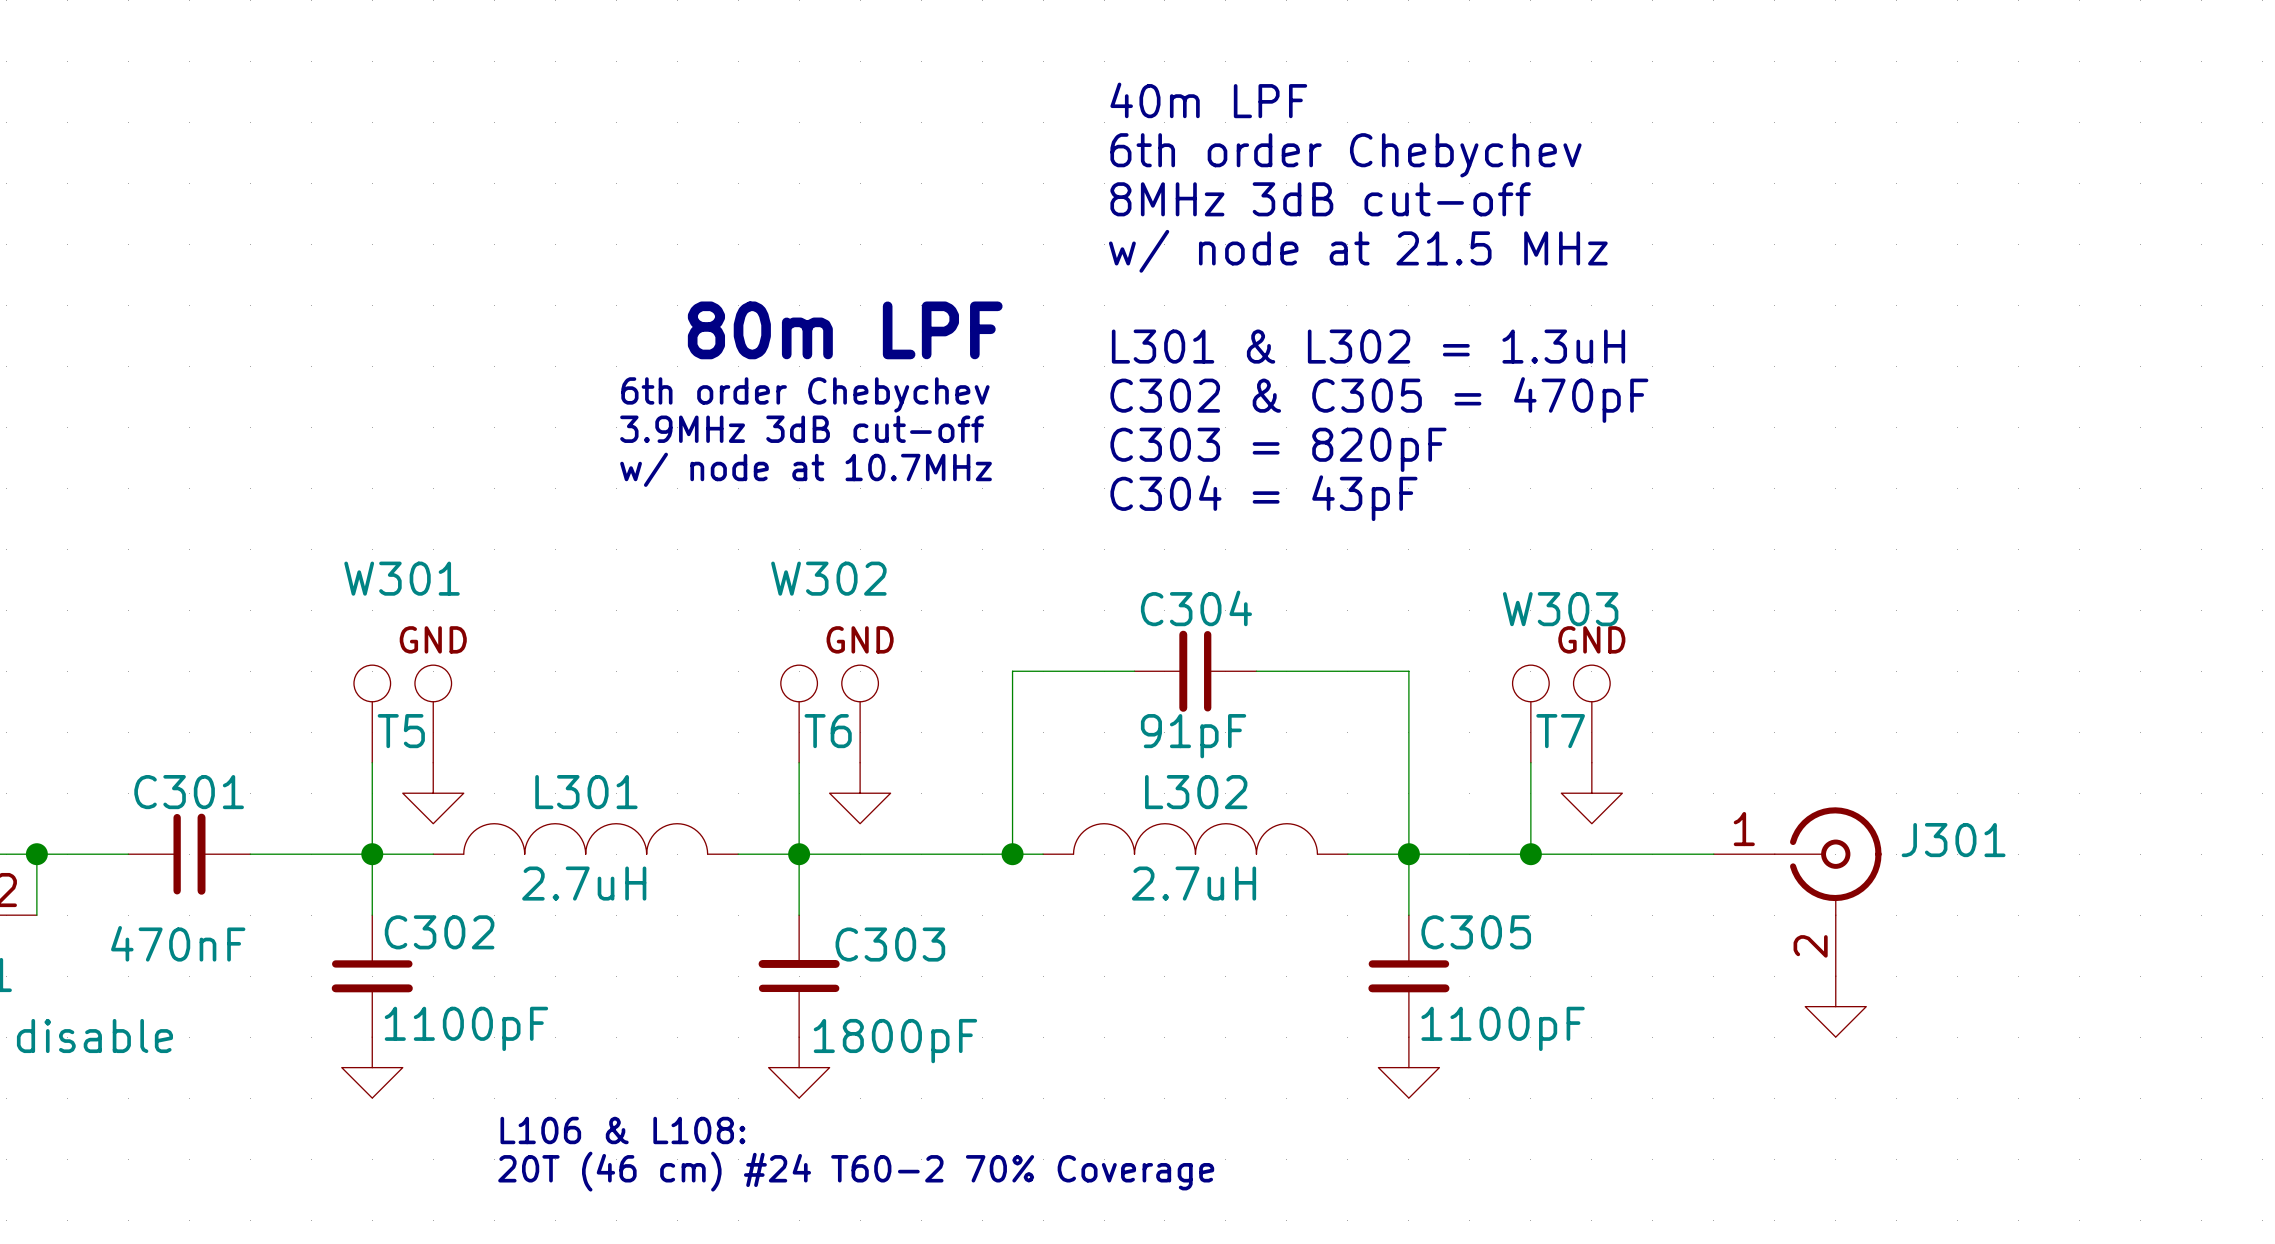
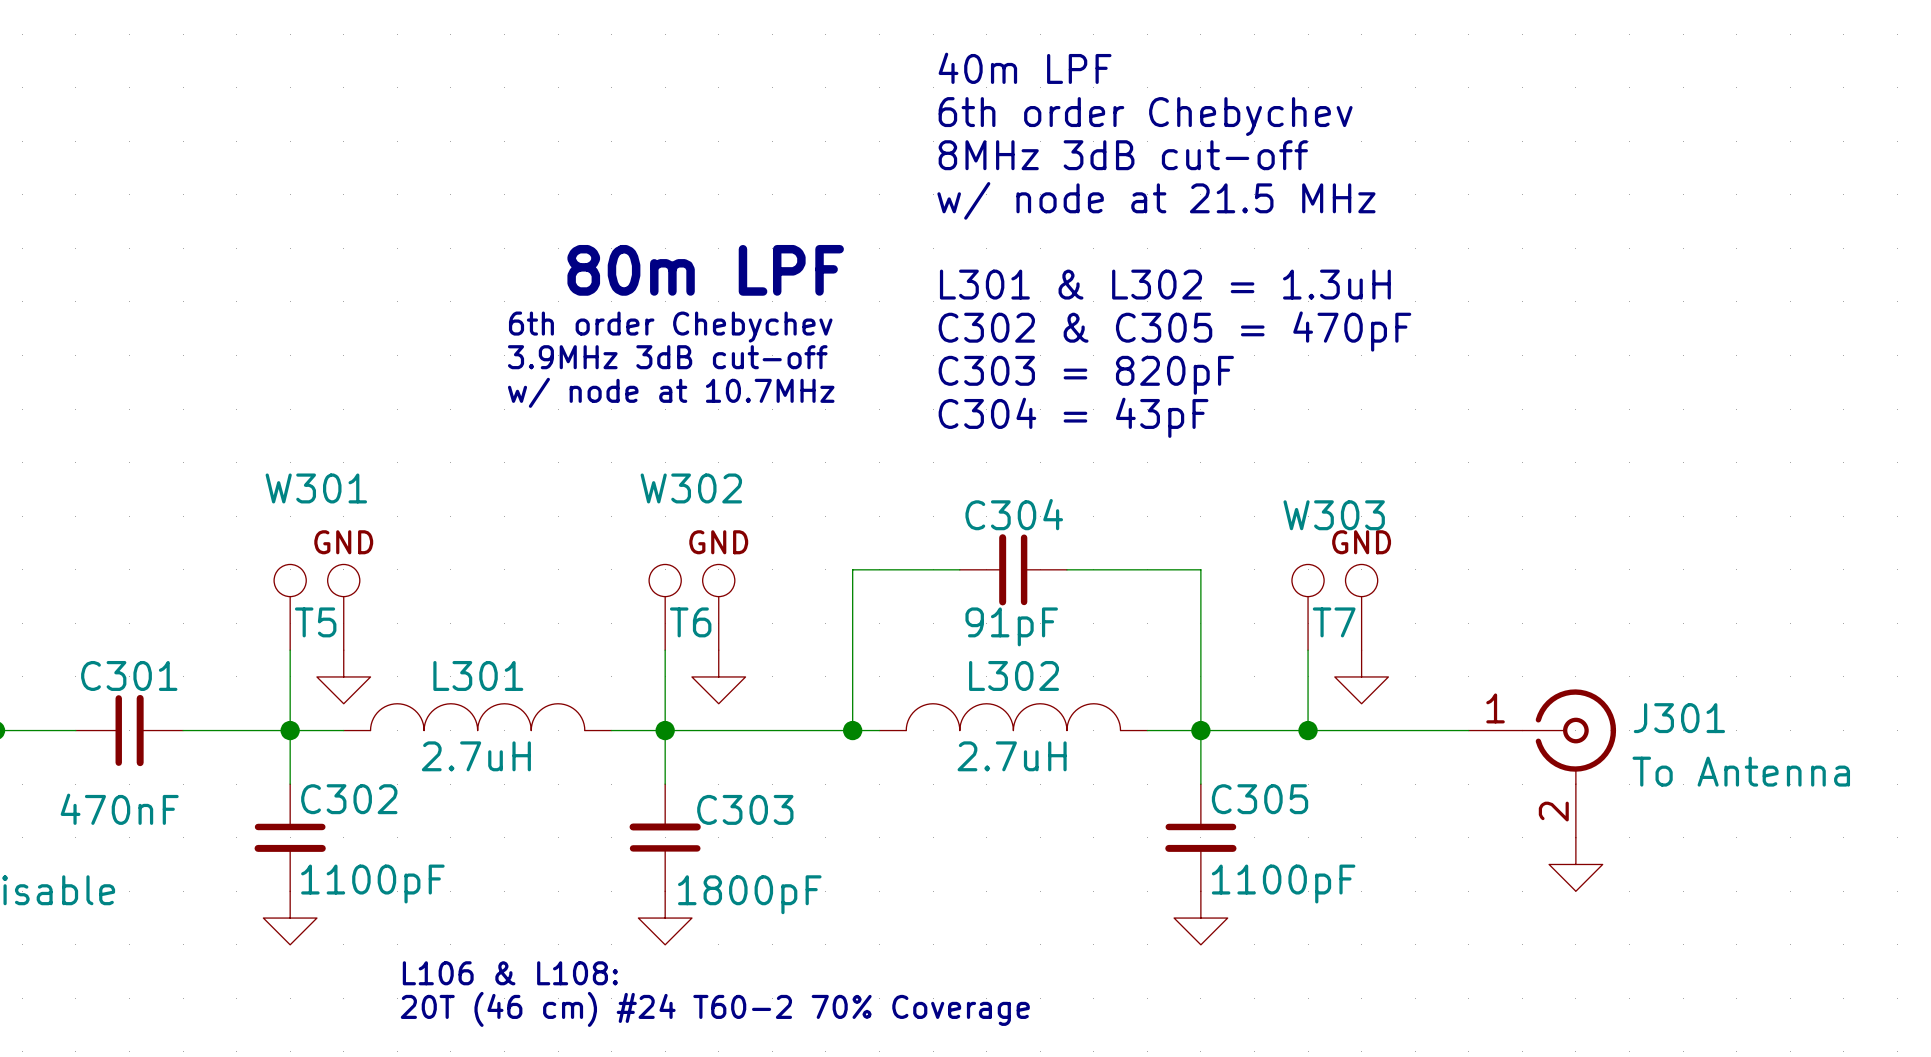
J301 value: none -> To Antenna (1741, 771)

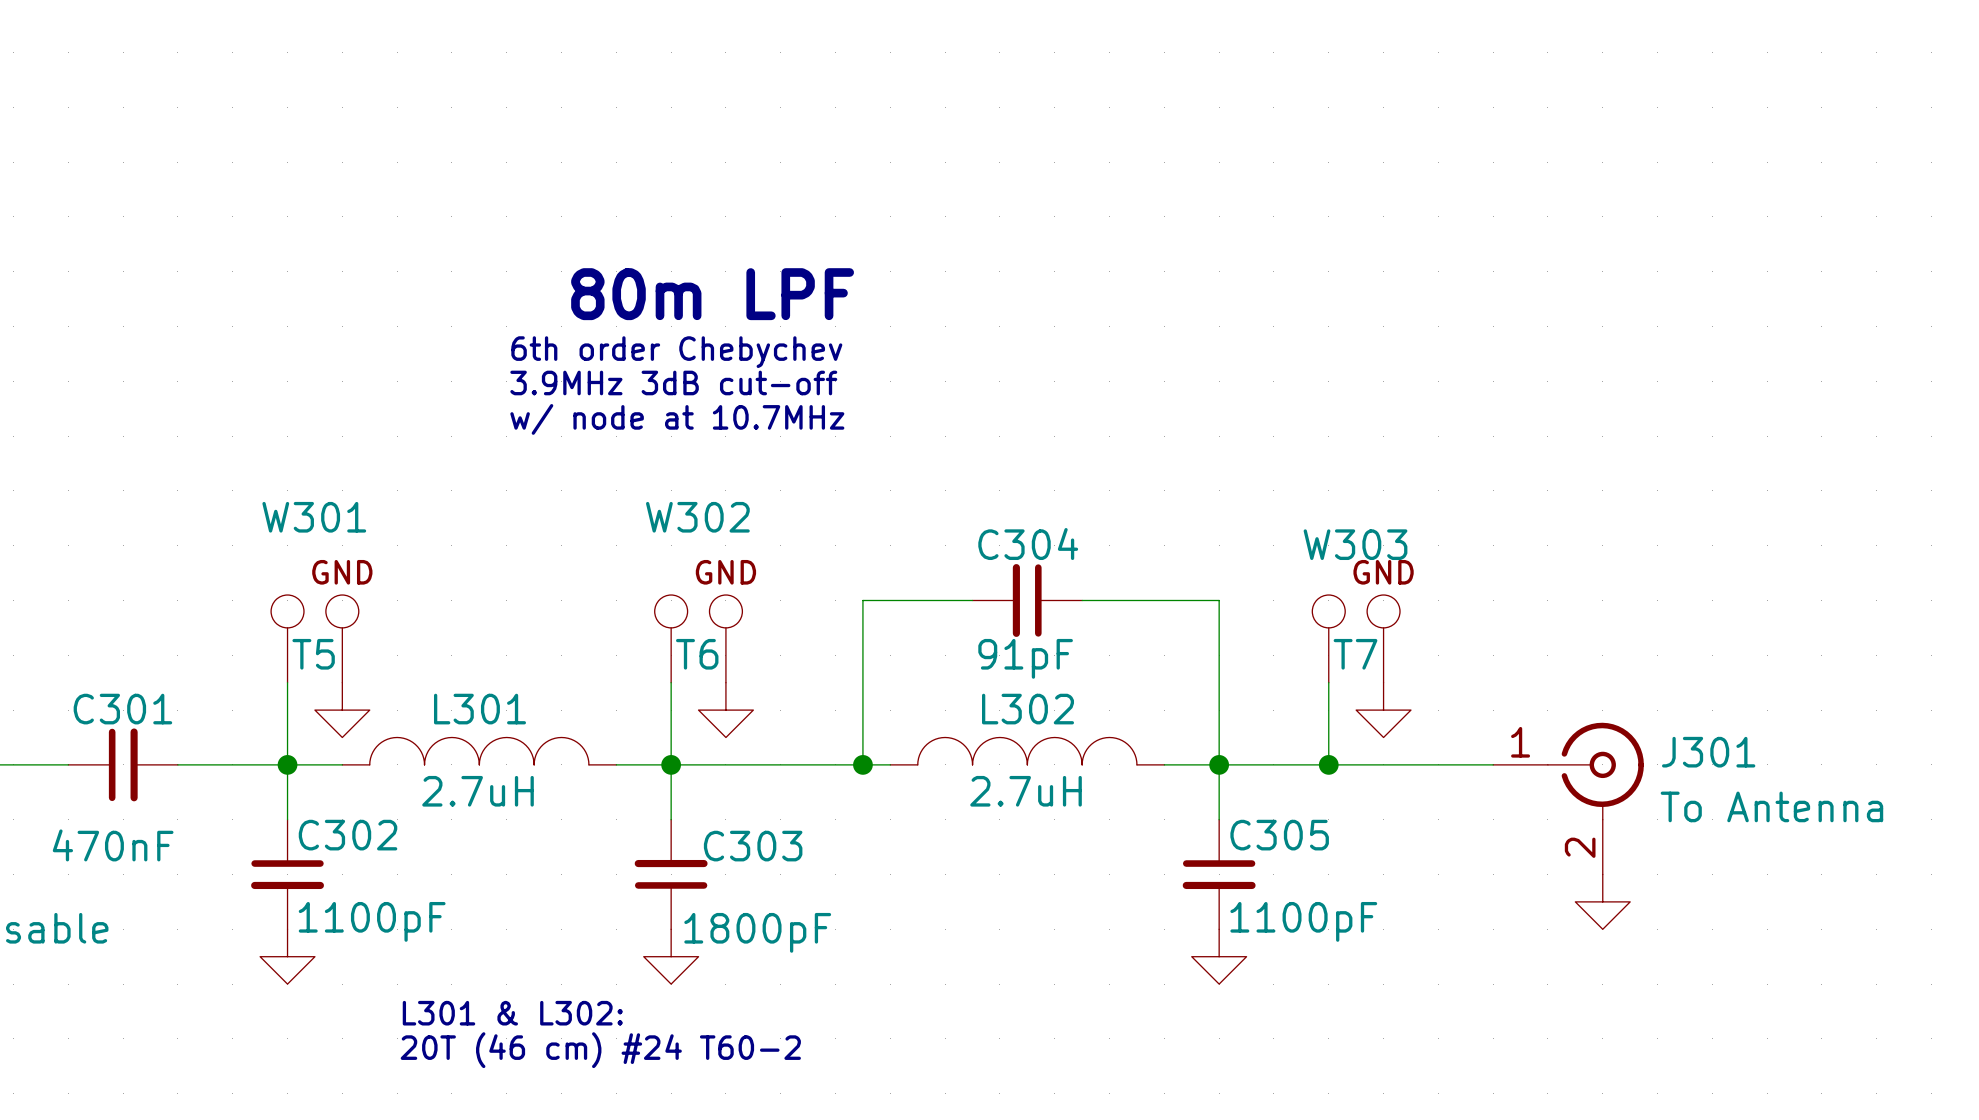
text: 40m LPF (1025, 68) -> none
text: 6th order Chebychev (1145, 116) -> none
text: 8MHz 3dB cut-off (1123, 155) -> none
text: w/ node at 21.5 MHz (1156, 200) -> none
text: L301 & L302 = 1.3uH (1165, 284) -> none
text: C302 & C305 = 470pF (1174, 331) -> none
text: C303 = 820pF (1086, 375) -> none
text: C304 = 43pF (1073, 417) -> none
text: L106 & L108: (510, 973) -> L301 & L302: (512, 1013)
text: 20T (46 cm) #24 T60-2 70% Coverage (715, 1009) -> 20T (46 cm) #24 T60-2 (600, 1050)

